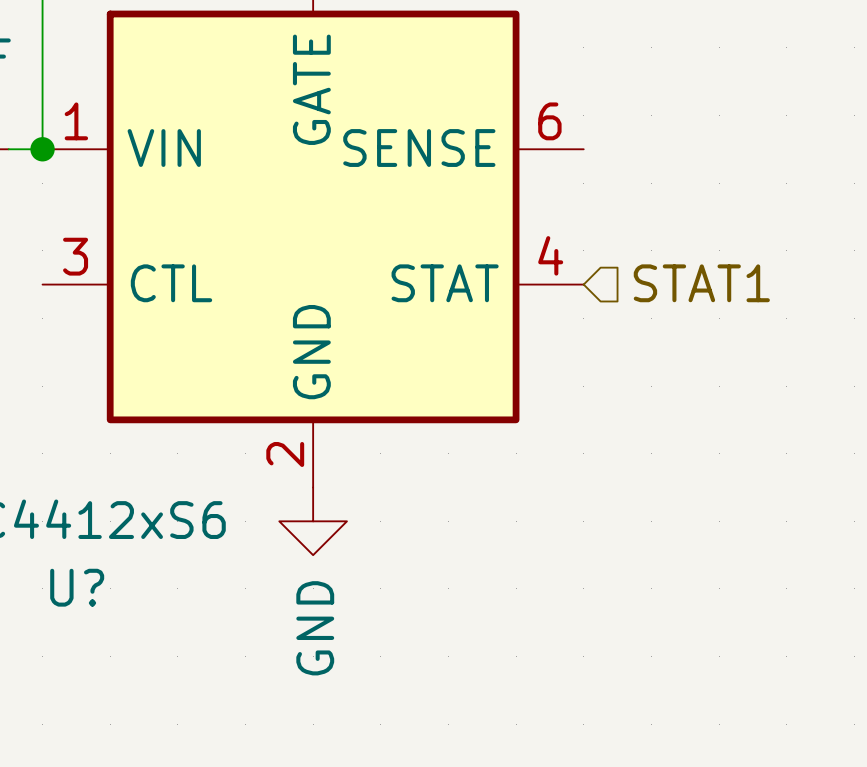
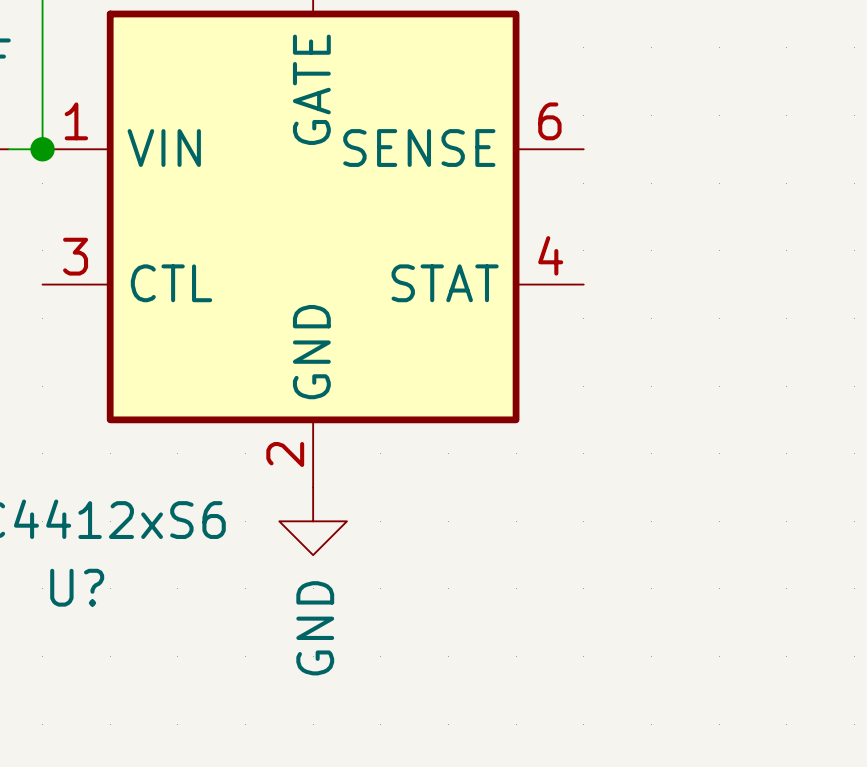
hierarchical label: STAT1 (701, 283) -> none

